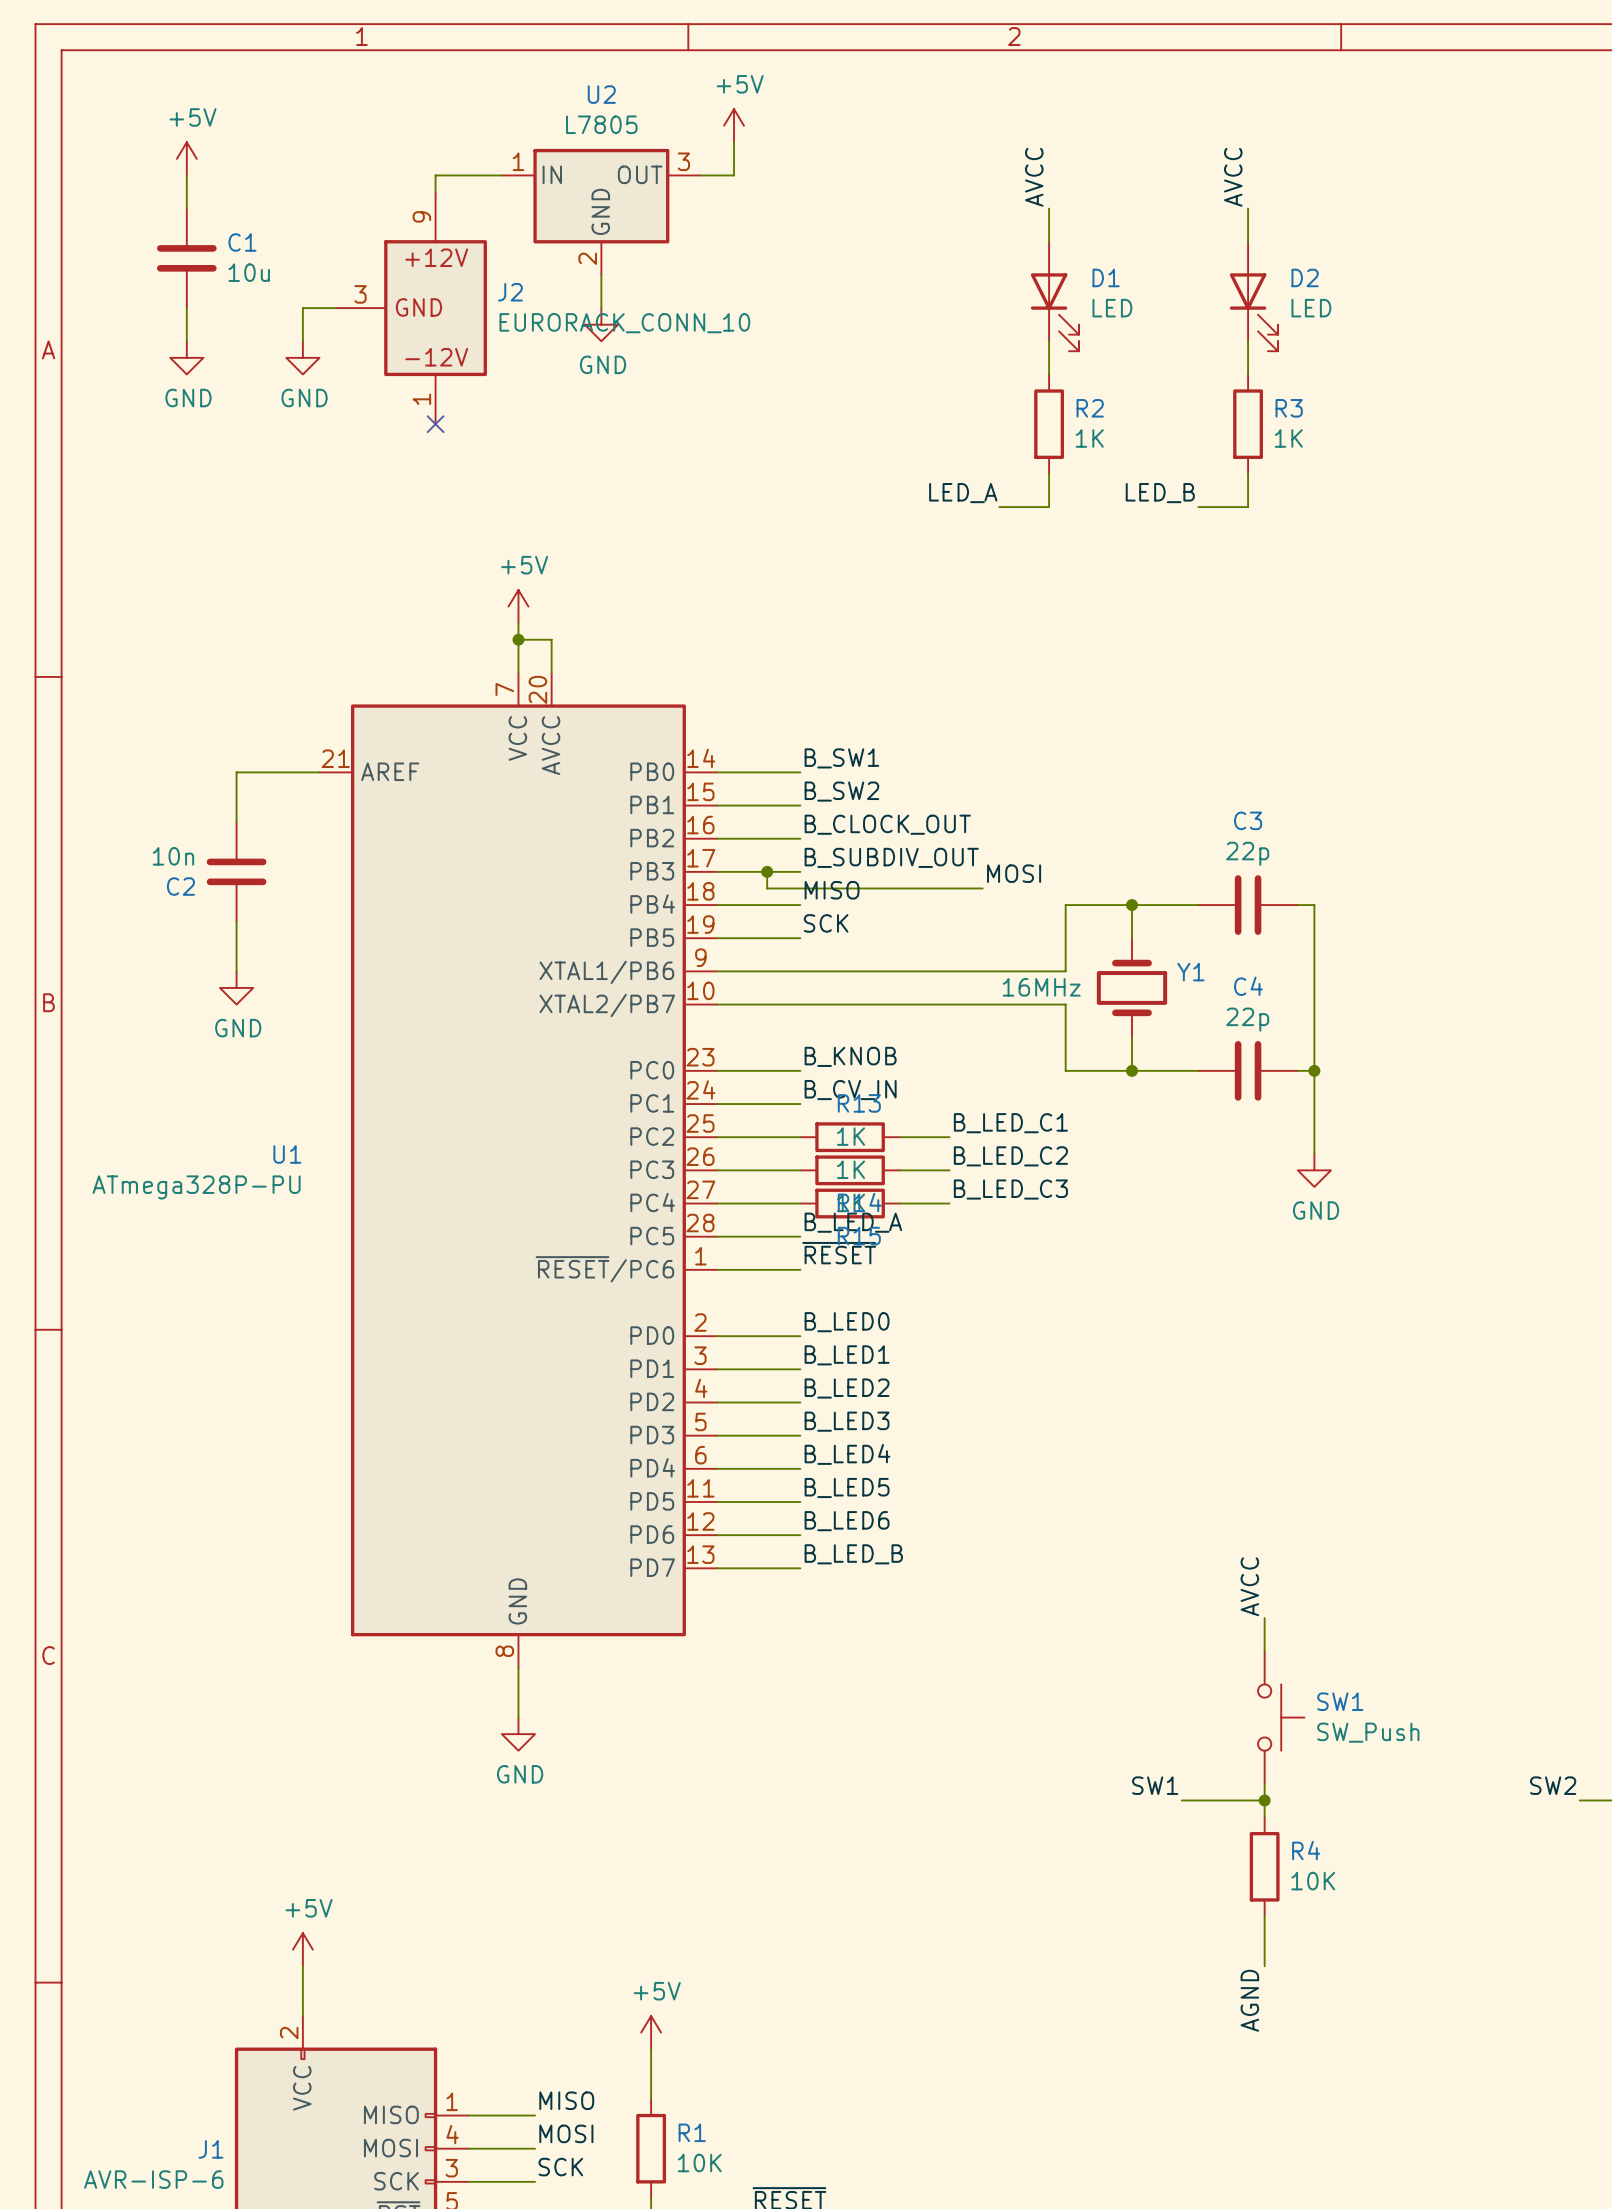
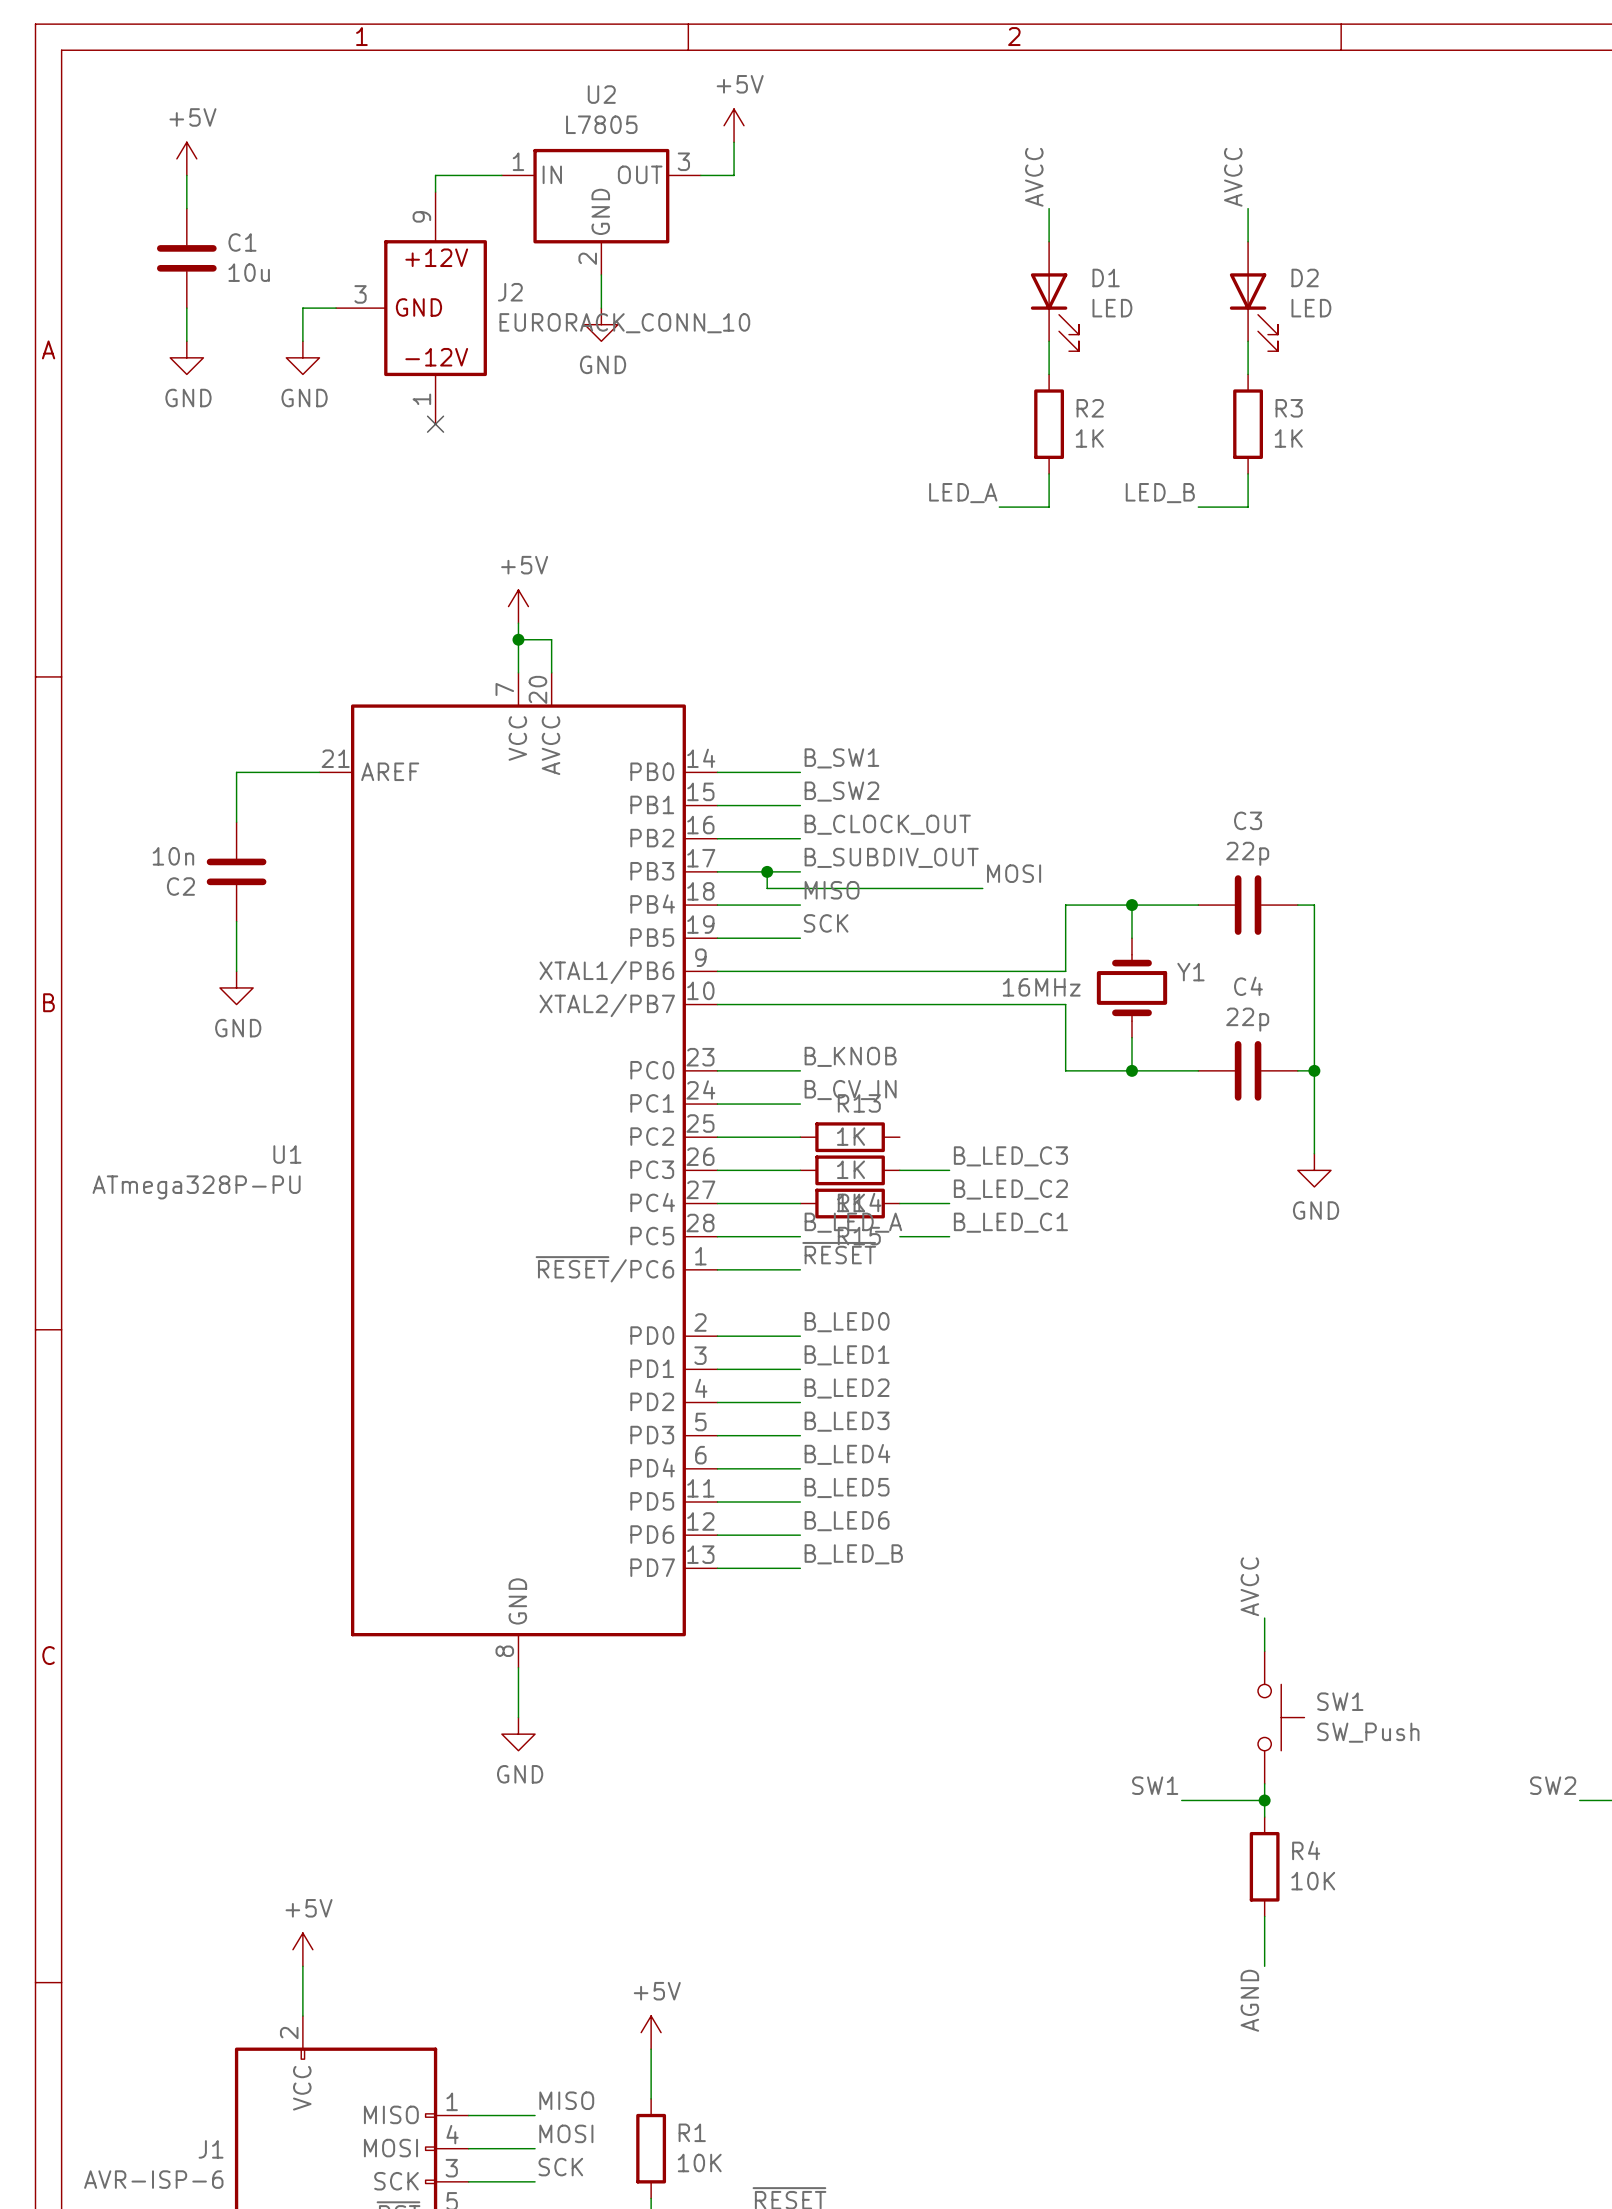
label position: B_LED_C1 (1010, 1123) -> B_LED_C1 (1010, 1222)
wire: (899, 1137) (949, 1137) -> (899, 1236) (949, 1236)
label: B_LED_C2 (1010, 1156) -> B_LED_C3 (1010, 1156)
label: B_LED_C3 (1010, 1189) -> B_LED_C2 (1010, 1189)

